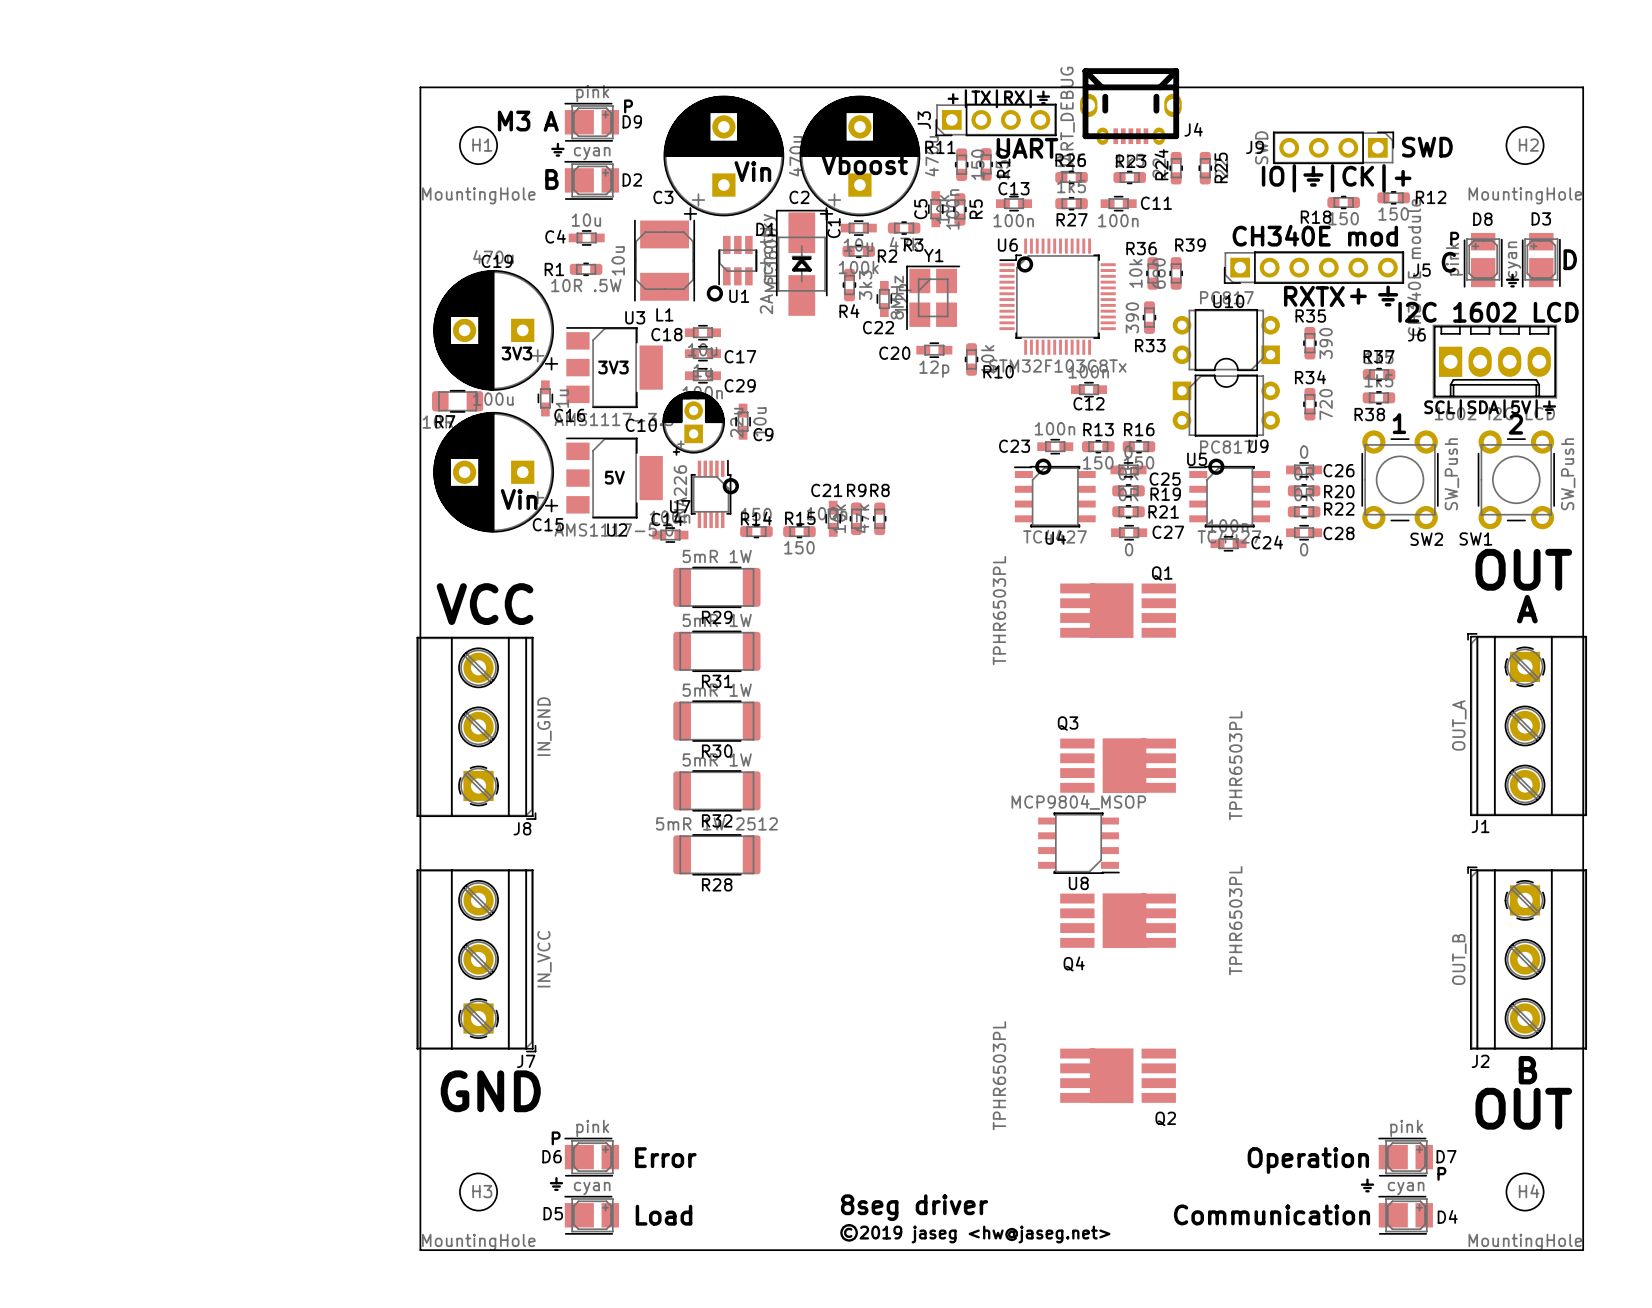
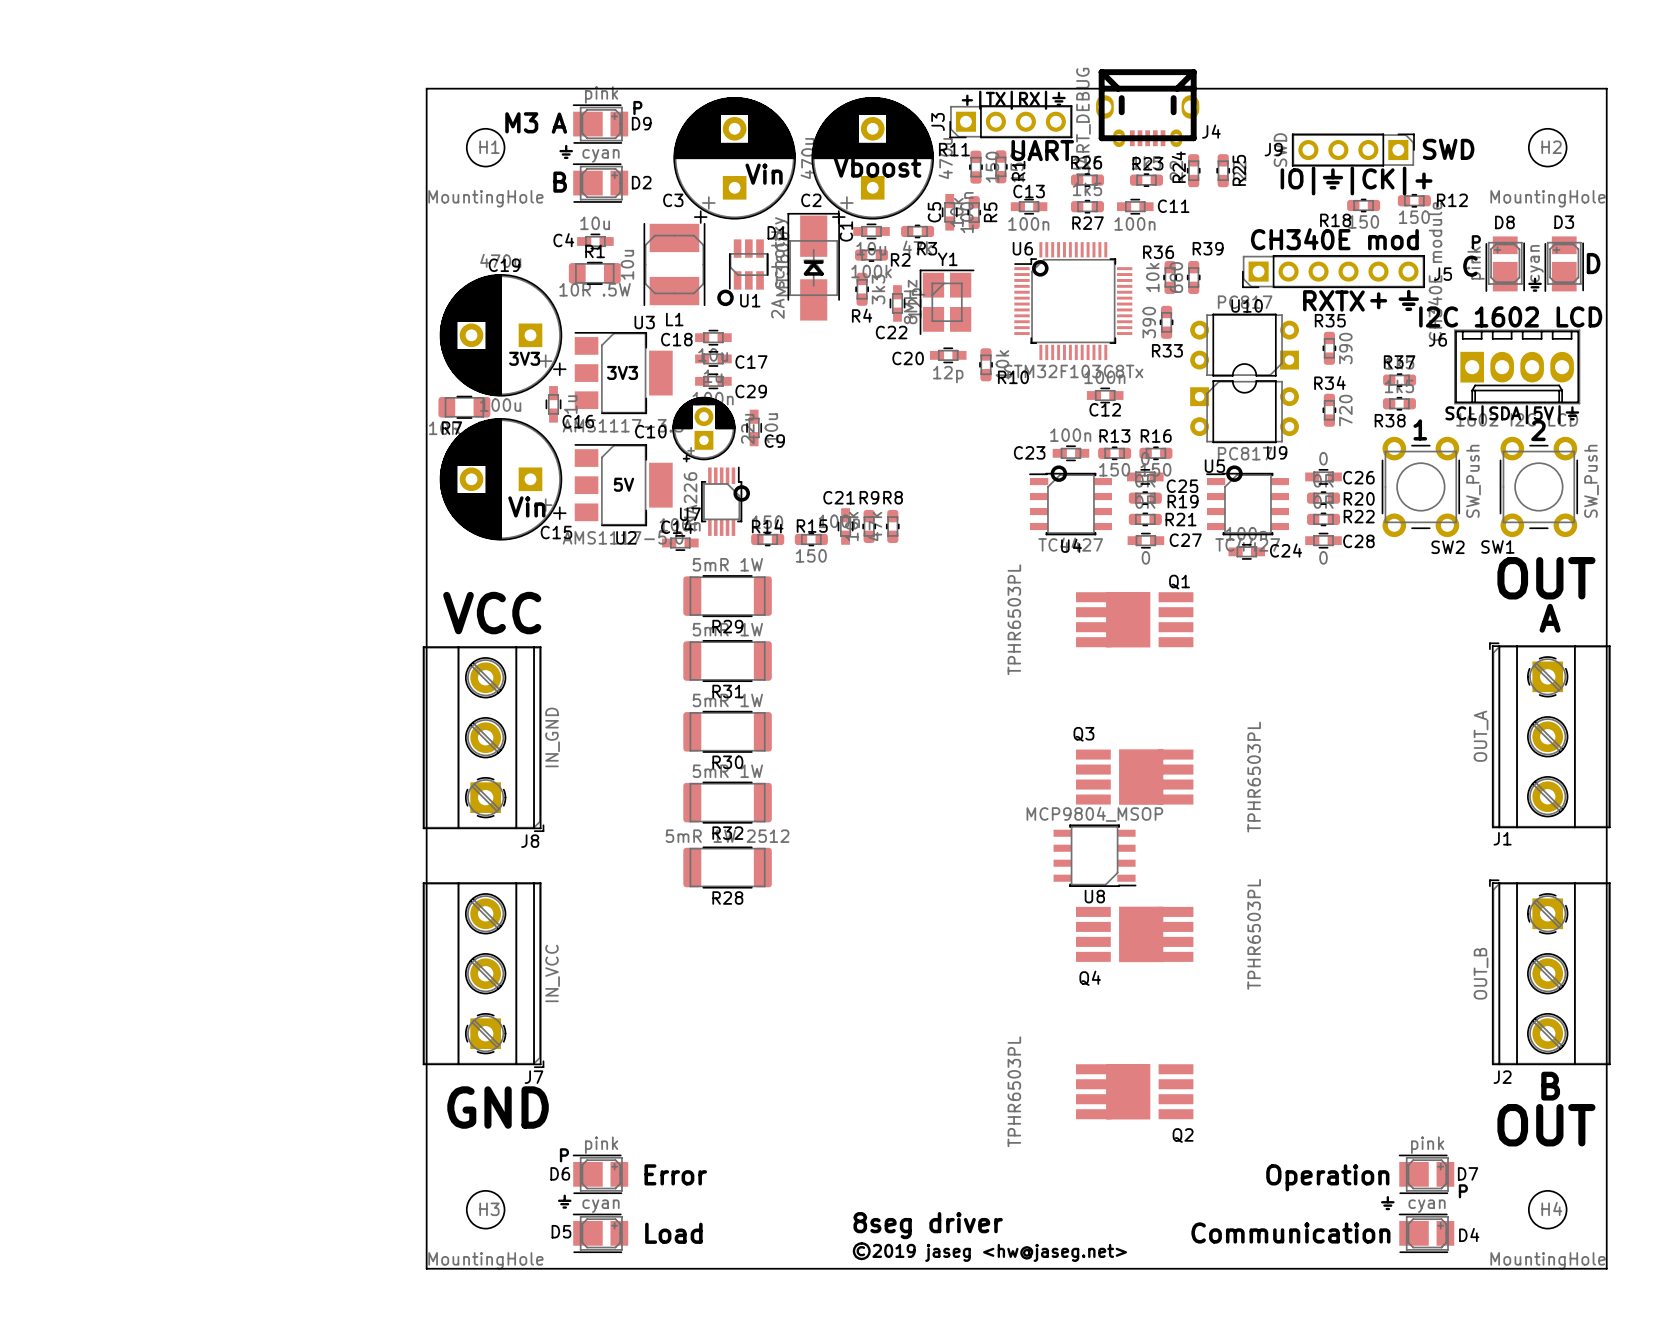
R1 footprint: [569, 262, 603, 276] -> [568, 261, 621, 285]
R1 name position: R1 (554, 269) -> R1 (595, 251)

